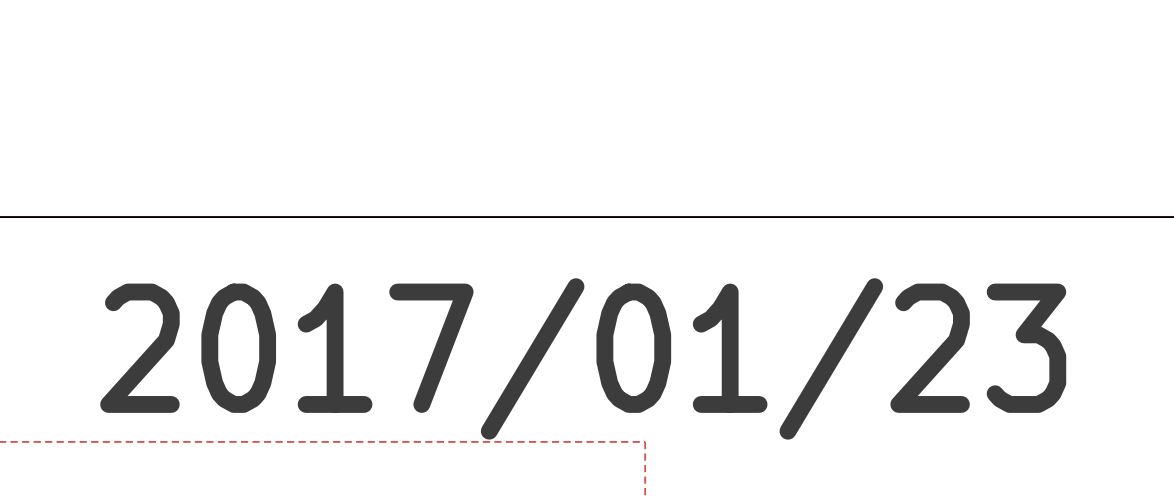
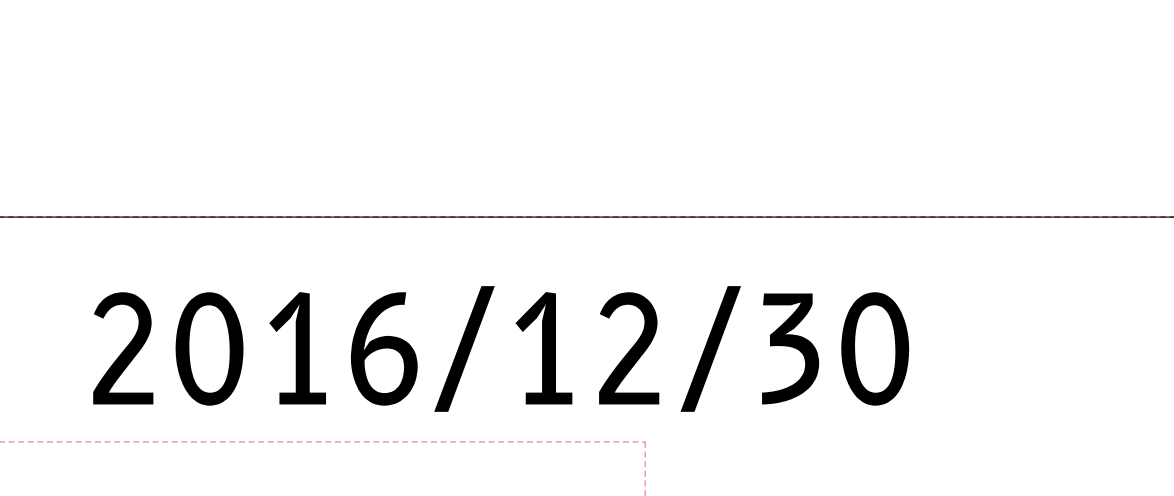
text: 2017/01/23 (583, 358) -> 2016/12/30 (501, 348)

